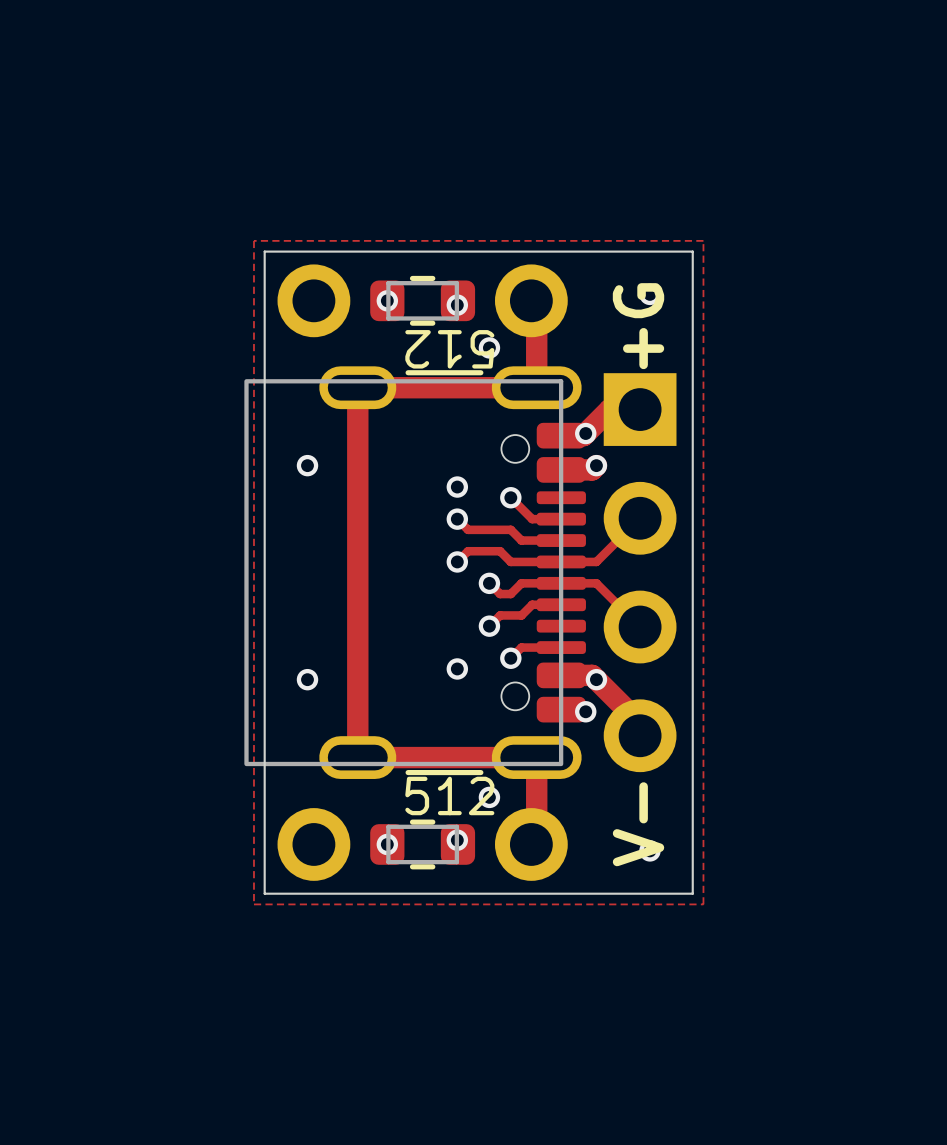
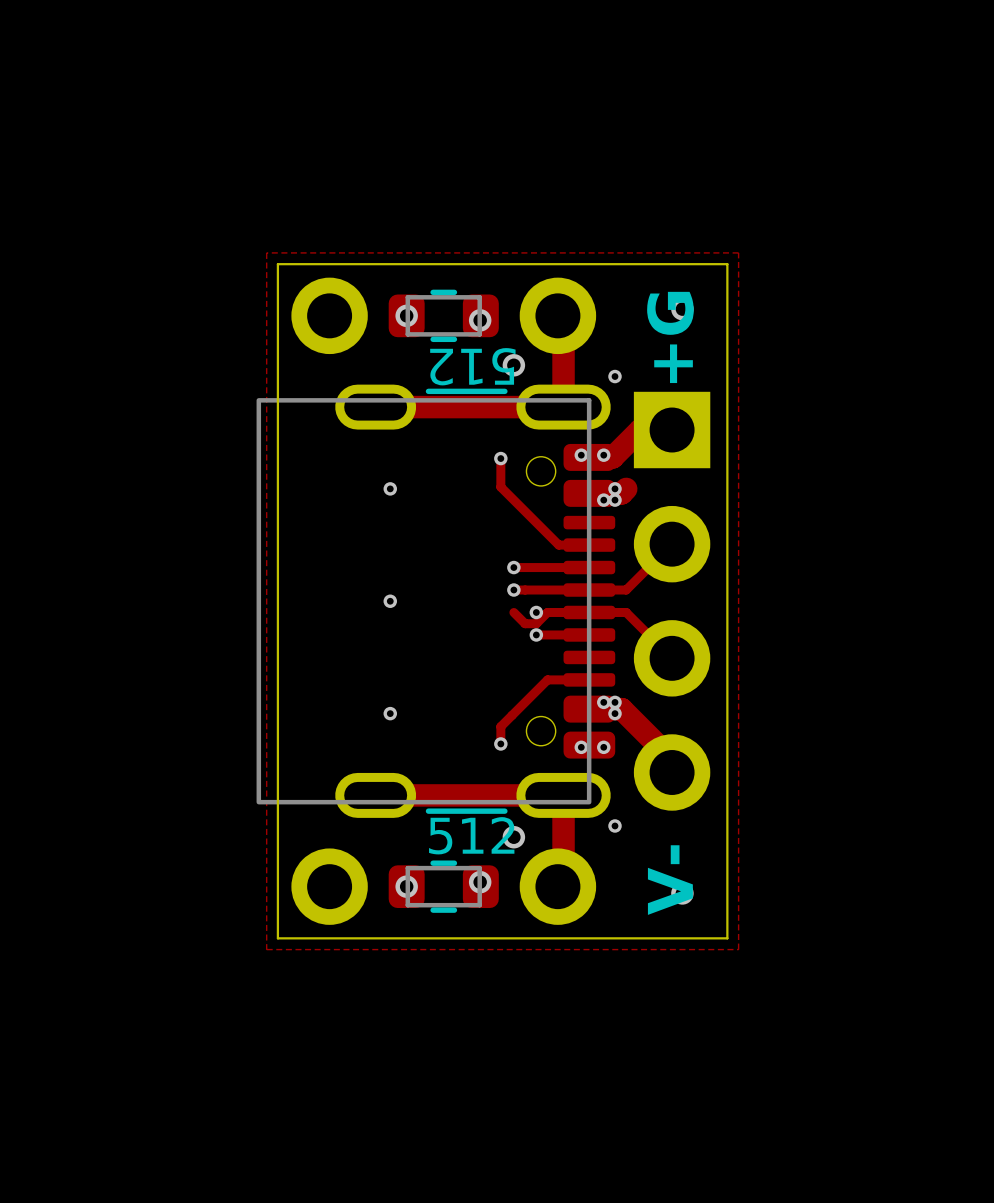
via: none -> (615, 376)
track: (357, 387) (357, 757) -> none
via size: [575, 422, 597, 445] -> [597, 448, 611, 462]
via: none -> (581, 455)
track: none -> (500, 458) (500, 487) (536, 522)
via: none -> (500, 458)
via: (307, 465) -> none
via: none -> (390, 488)
via: none -> (615, 488)
via: (596, 465) -> none
via: none -> (603, 500)
via: none -> (615, 500)
via: (457, 487) -> none
via: (510, 497) -> none
track: (457, 519) (468, 529) (510, 529) (521, 540) -> (513, 567) (547, 567)
via: (457, 519) -> none
via: none -> (513, 567)
track: (457, 561) (468, 551) (500, 551) (510, 561) -> (513, 590) (536, 590)
via: (457, 561) -> none
via: none -> (513, 590)
via: none -> (390, 601)
via: (489, 583) -> none
via: none -> (536, 612)
via: none -> (536, 634)
track: (532, 604) (521, 615) (500, 615) (489, 626) -> (558, 634) (536, 634)
via: (489, 626) -> none
track: none -> (536, 691) (500, 726) (500, 743)
via: (510, 658) -> none
via: (457, 668) -> none
via: none -> (603, 702)
via: none -> (615, 702)
via: (307, 679) -> none
via: none -> (390, 713)
via: none -> (615, 713)
via: (596, 679) -> none
via size: [575, 701, 597, 723] -> [597, 740, 611, 755]
via: none -> (500, 743)
via: none -> (581, 747)
via: none -> (615, 825)

